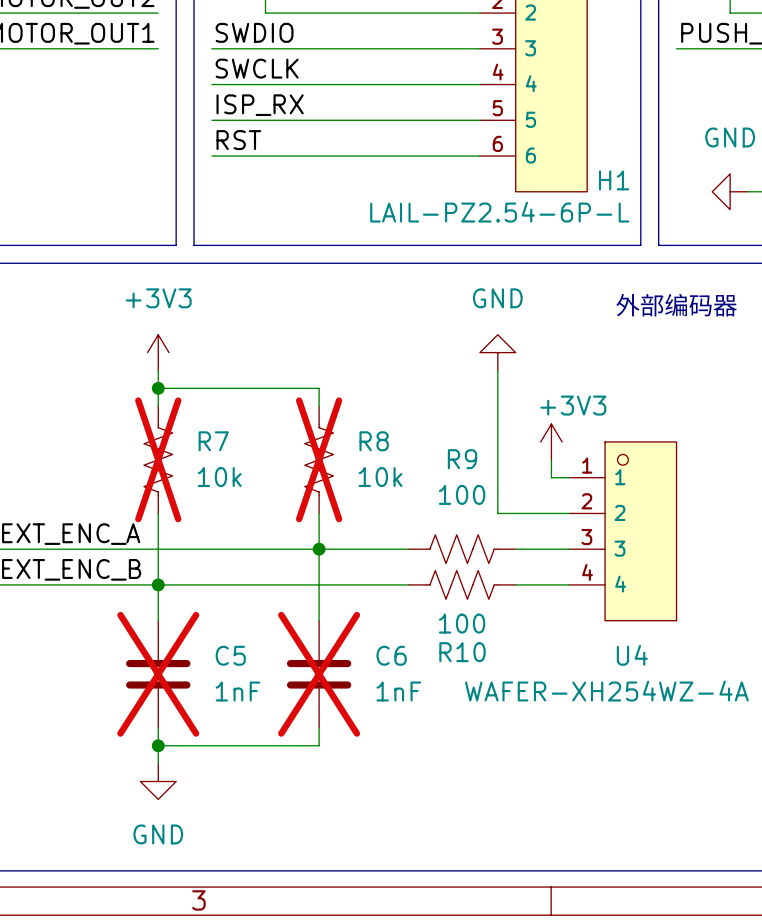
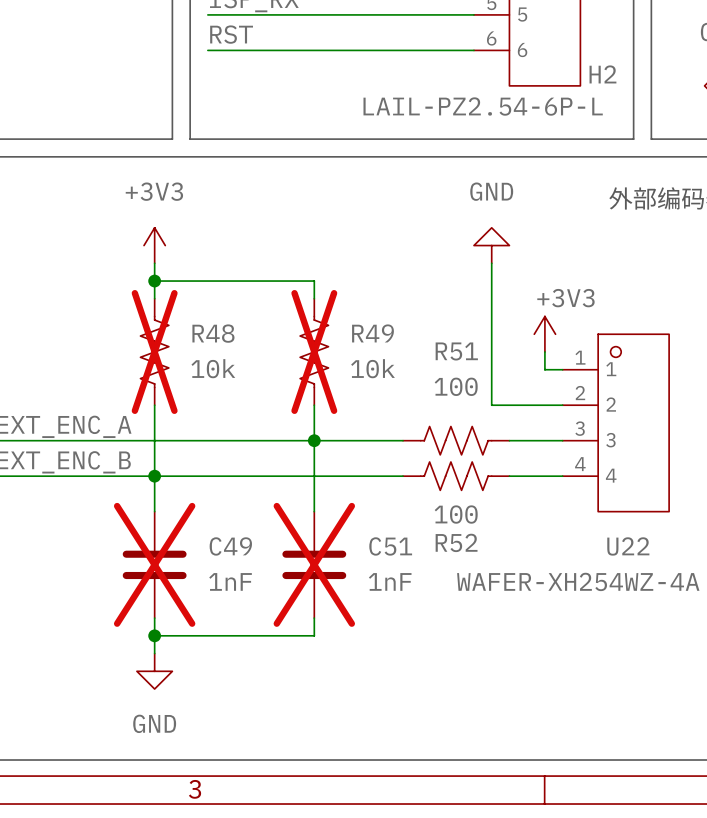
H1 name: H1 (614, 180) -> H2 (602, 74)
R7 name: R7 (213, 441) -> R48 (213, 333)
R8 name: R8 (374, 441) -> R49 (372, 333)
R9 name: R9 (462, 459) -> R51 (456, 351)
R10 name: R10 (462, 652) -> R52 (456, 542)
C5 name: C5 (230, 655) -> C49 (230, 546)
C6 name: C6 (391, 655) -> C51 (390, 546)
U4 name: U4 (632, 655) -> U22 (628, 546)

